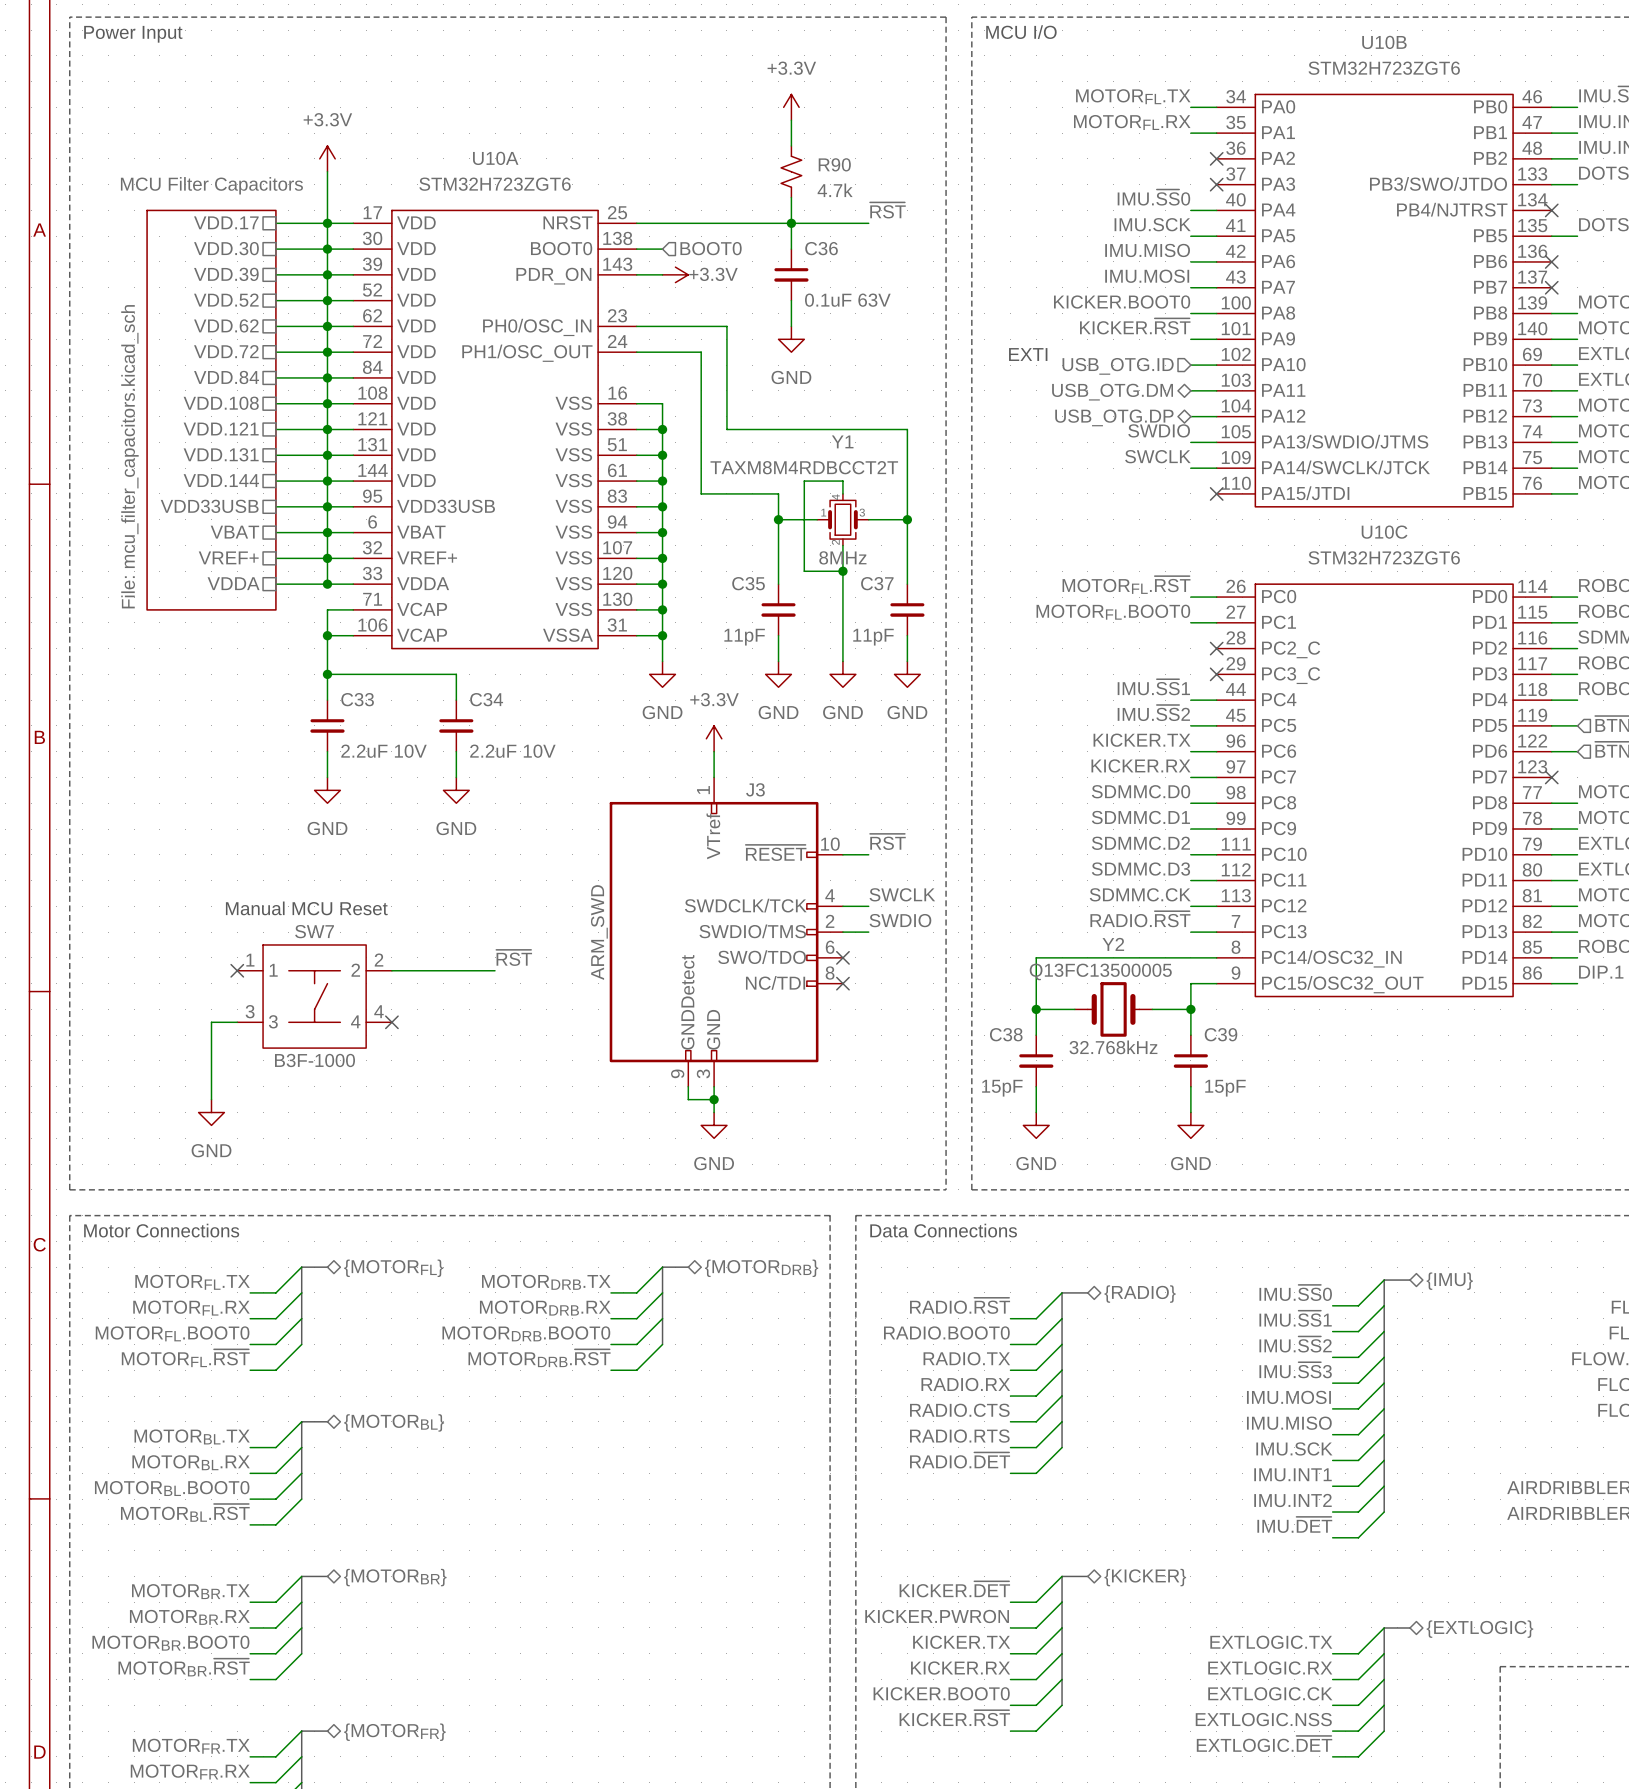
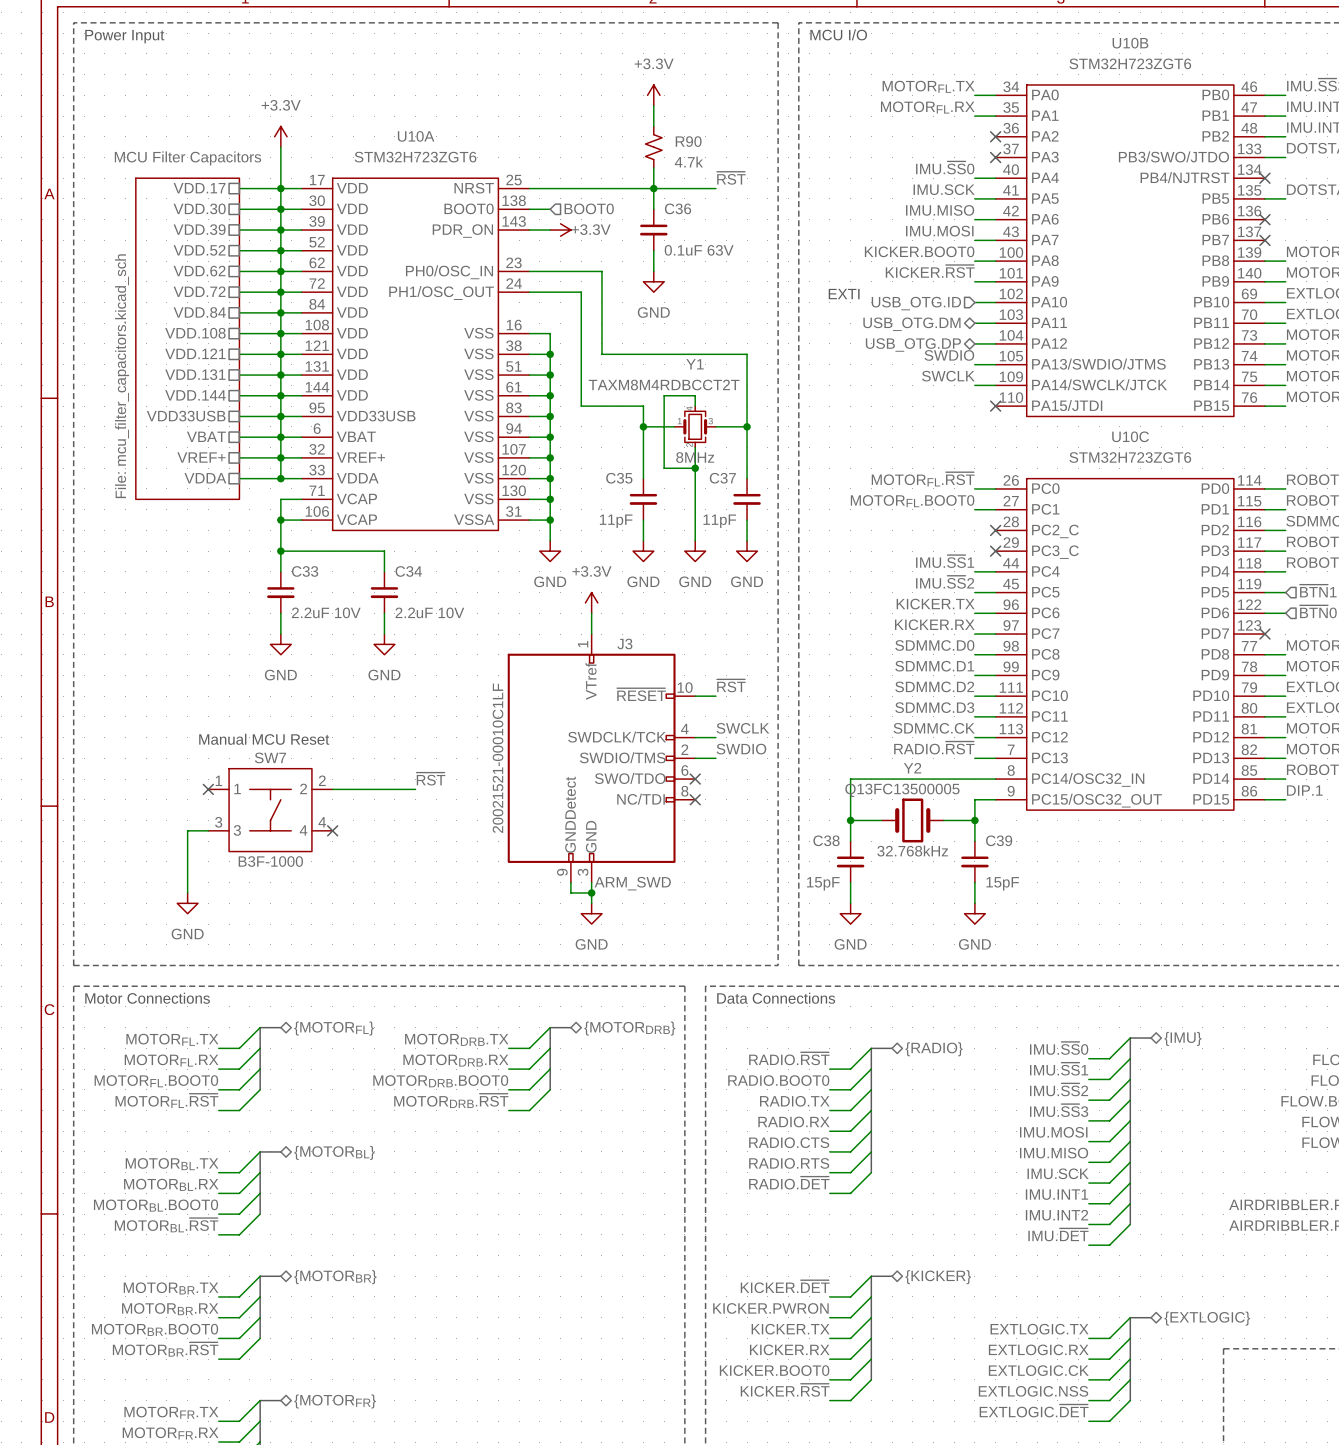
J3 value: ARM_SWD (599, 932) -> 20021521-00010C1LF (498, 758)
J3 text: none -> ARM_SWD (632, 883)

